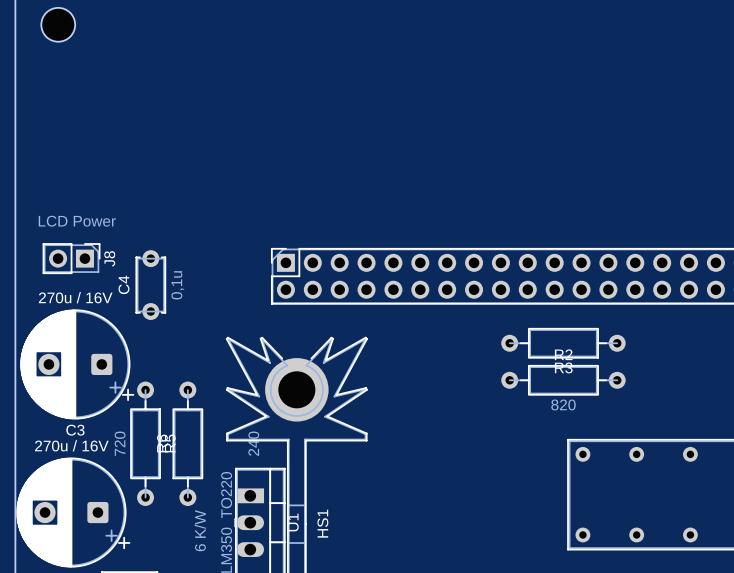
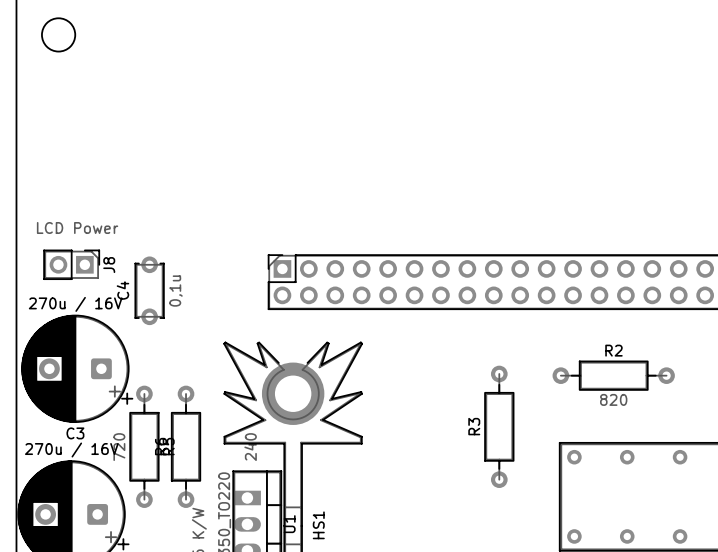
R3 rotation: 0° (563, 343) -> 90° clockwise (499, 426)
R3 position: (563, 343) -> (499, 426)
R2 position: (563, 380) -> (613, 375)

